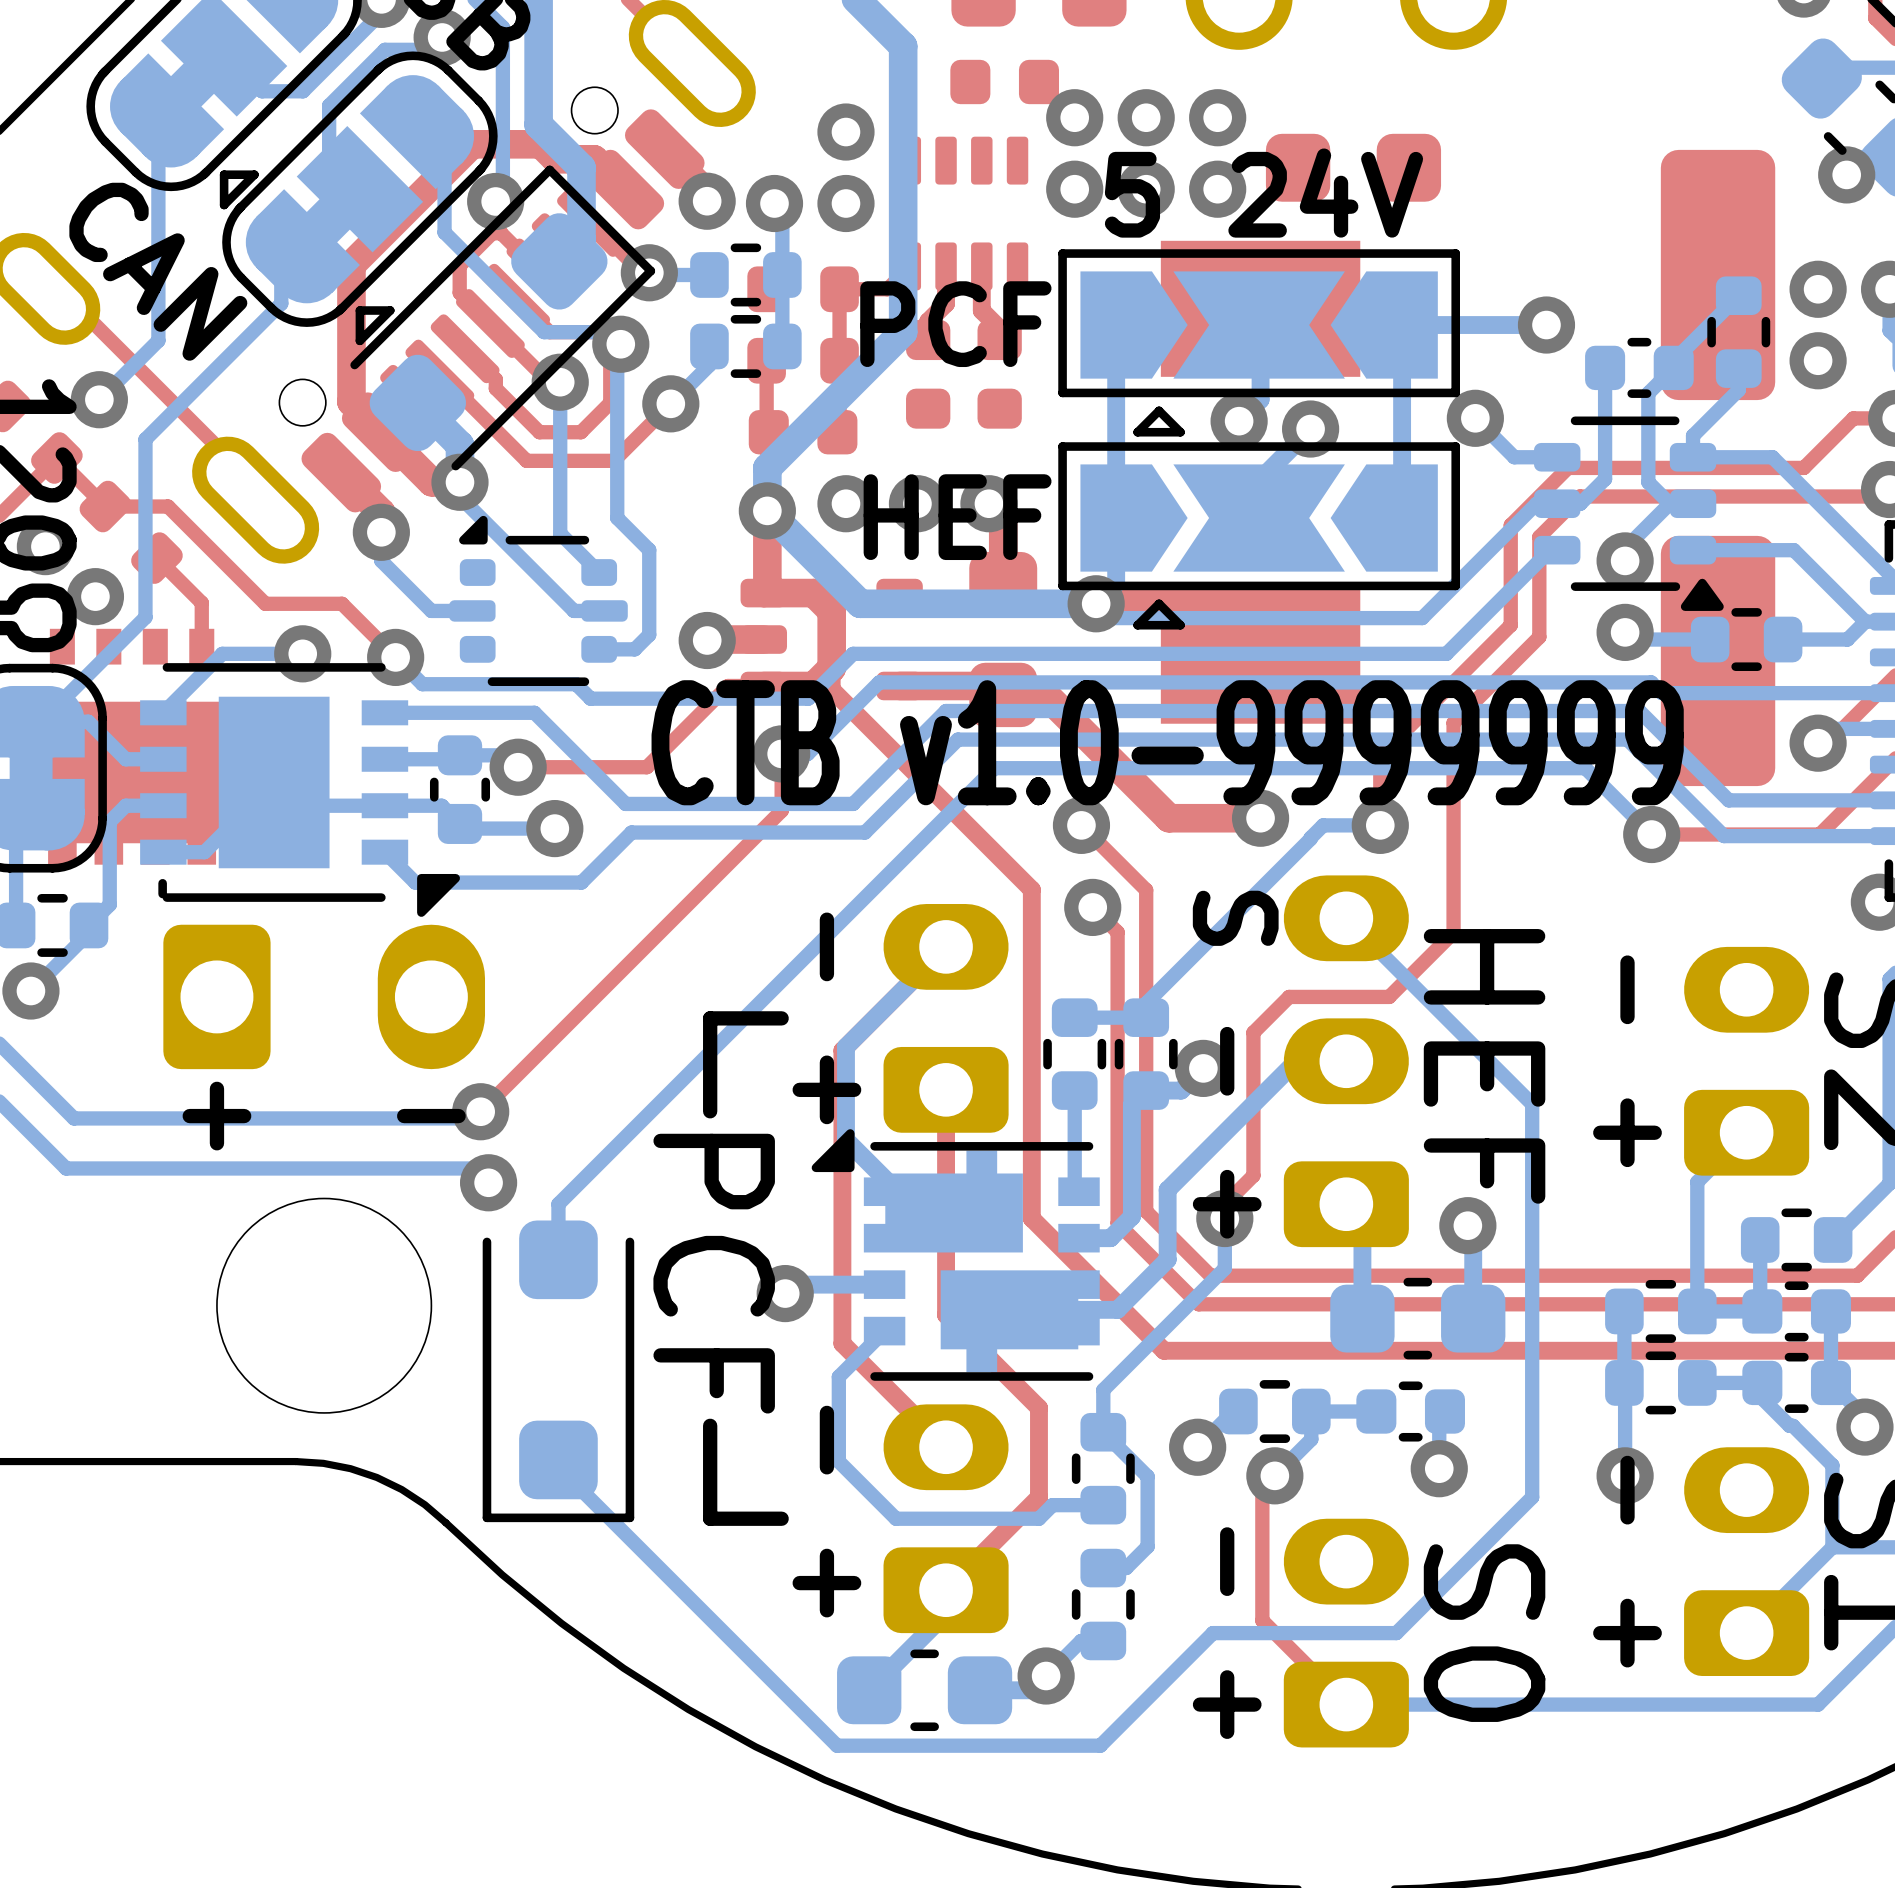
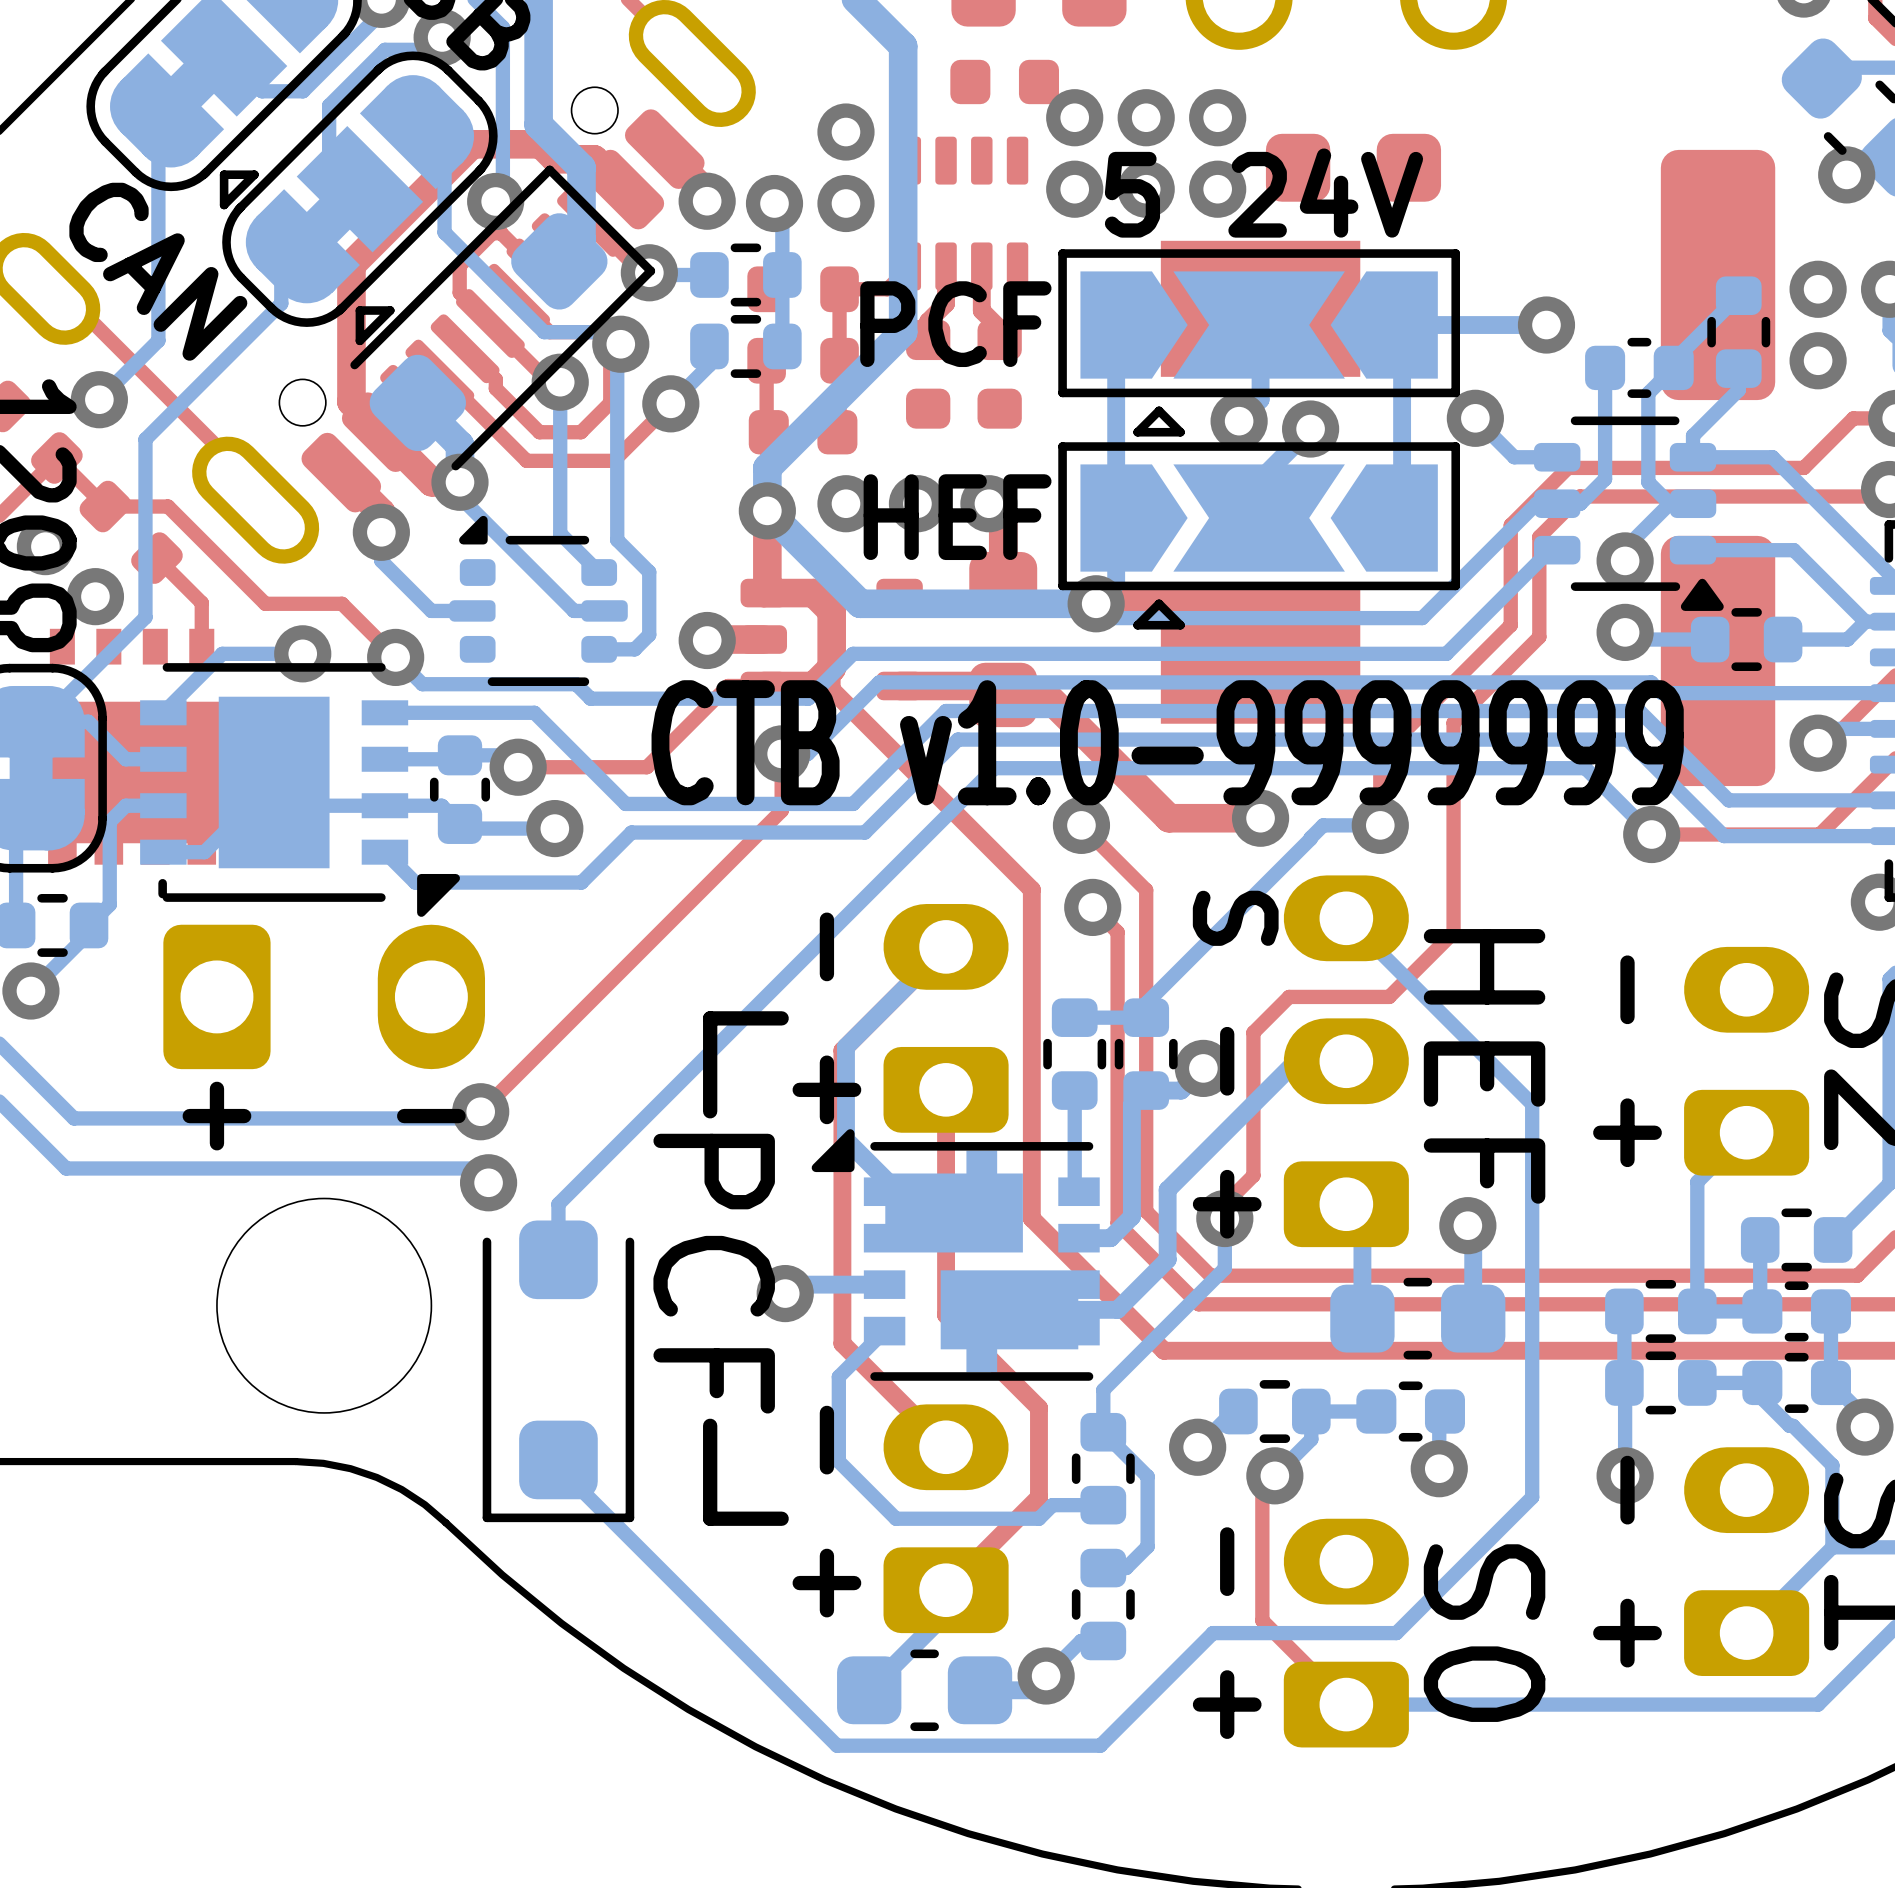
bottom track: (617, 518) (649, 550) (649, 572) -> (617, 518) (617, 540) (649, 572)

